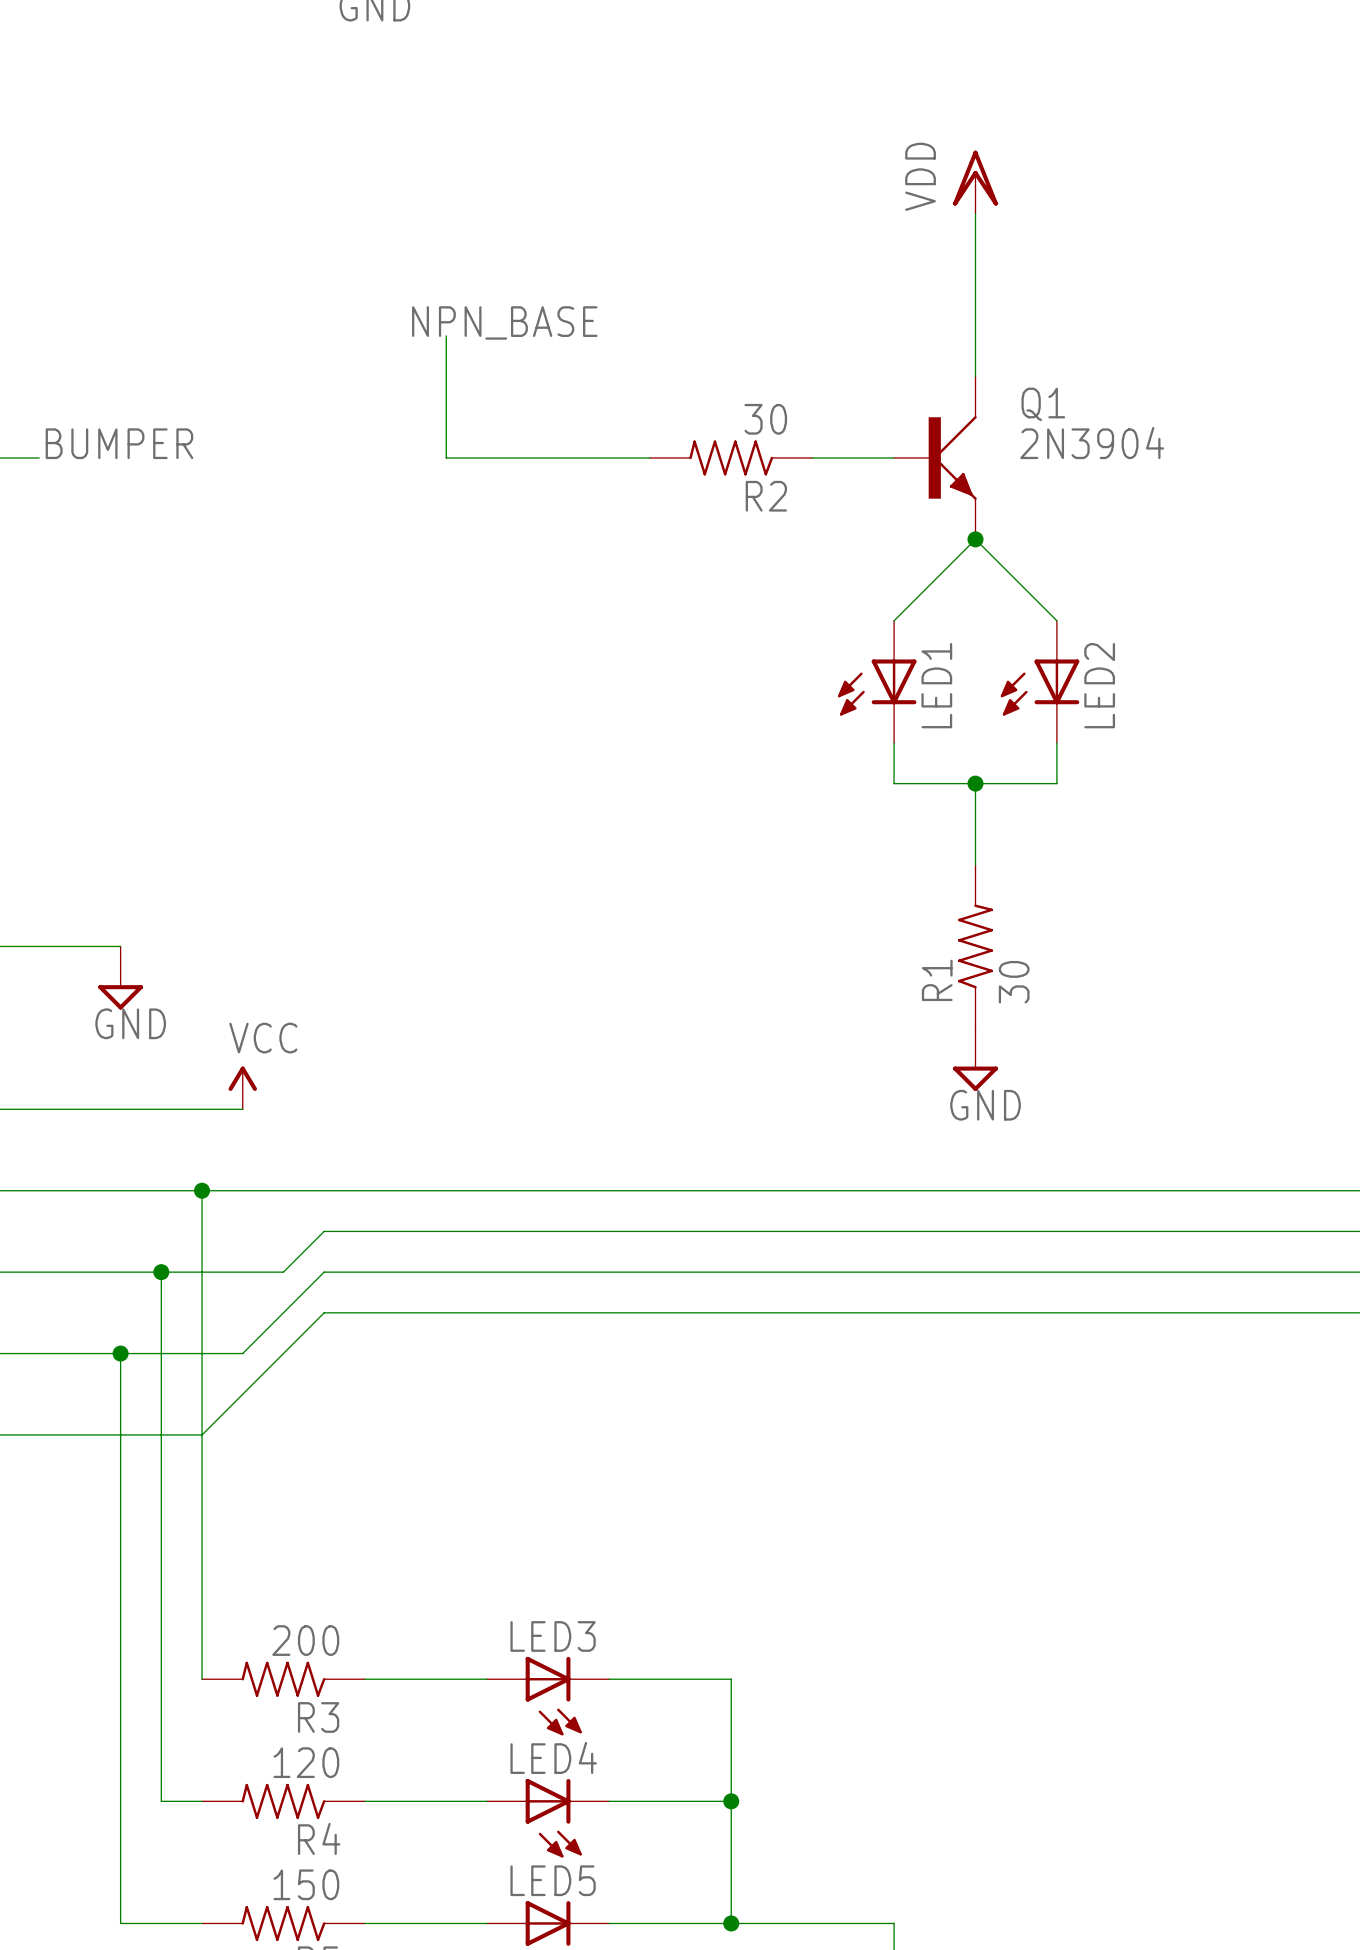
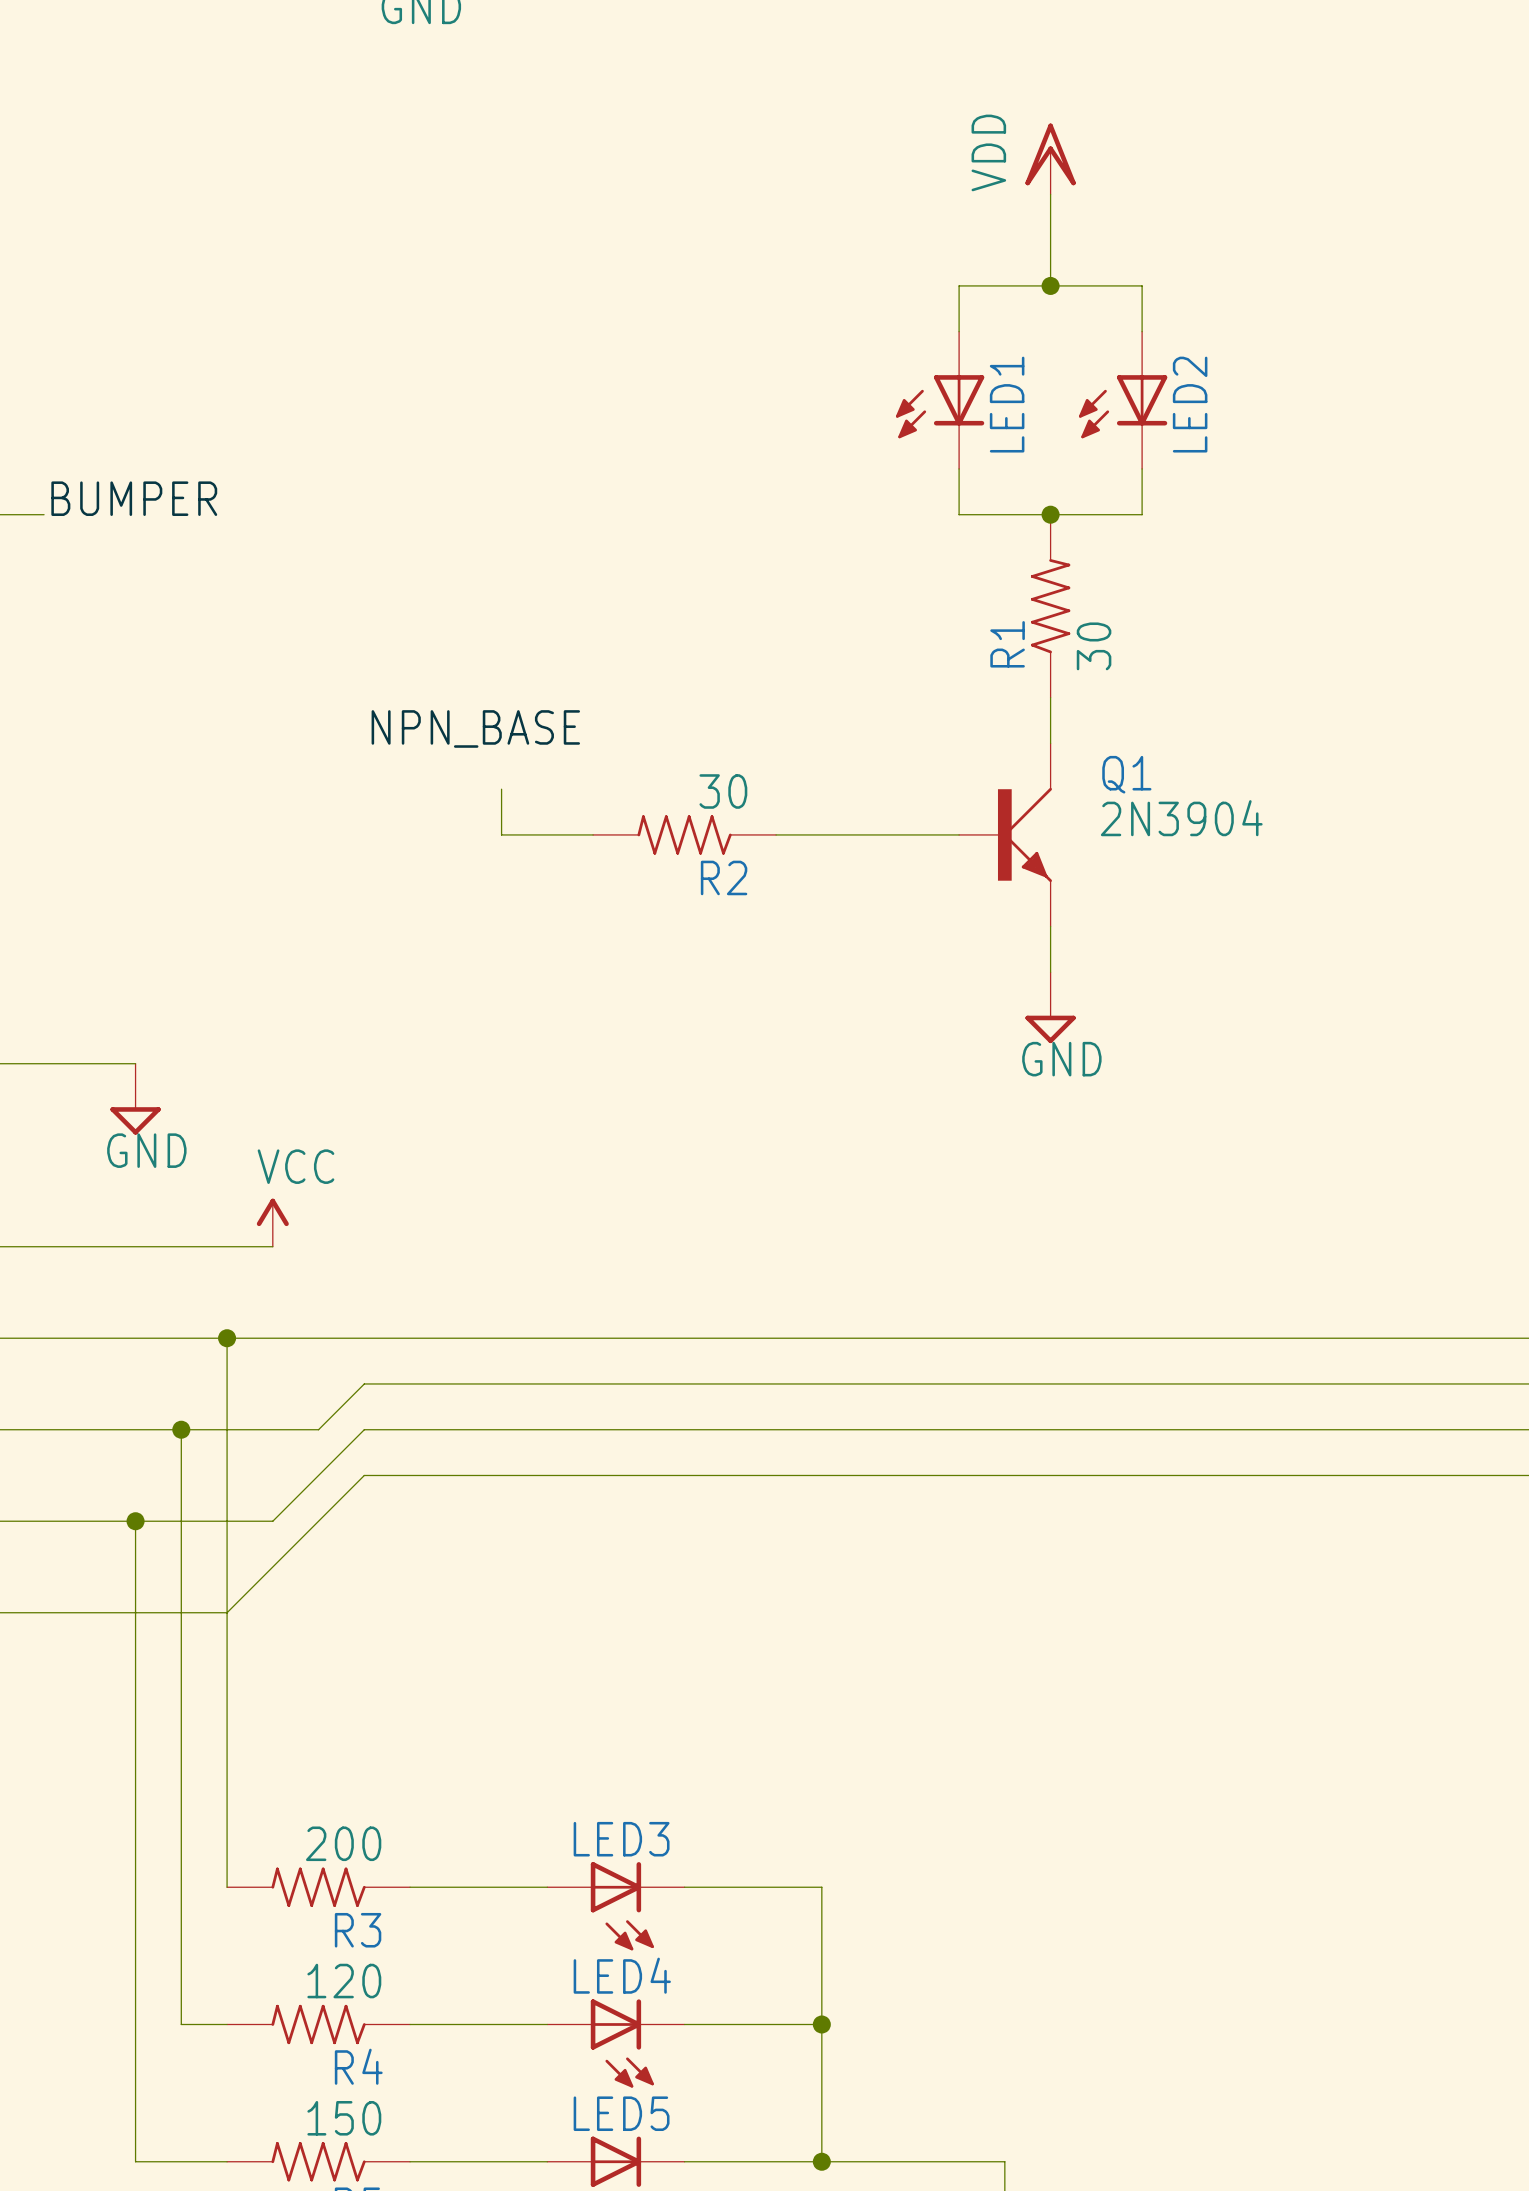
wire: none -> (1050, 194) (1050, 285)
power symbol position: VDD (975, 182) -> VDD (1050, 158)
wire: (975, 213) (975, 376) -> none
junction: none -> (1050, 285)
wire: none -> (959, 331) (959, 285) (1142, 285) (1142, 331)
label position: NPN_BASE (504, 322) -> NPN_BASE (475, 728)
wire: (446, 335) (446, 457) (649, 457) -> none
wire: none -> (1142, 468) (1142, 514) (1004, 514)
R2 position: (731, 457) -> (684, 834)
wire: (812, 457) (853, 457) -> (959, 468) (959, 514)
Q1 position: (935, 457) -> (1005, 834)
junction position: (975, 539) -> (1050, 514)
wire: (894, 620) (975, 539) (1056, 620) -> none
wire: none -> (1050, 697) (1050, 743)
LED1 position: (877, 681) -> (940, 400)
LED2 position: (1040, 681) -> (1123, 400)
wire: none -> (501, 789) (501, 834) (593, 834)
wire: none -> (776, 834) (959, 834)
wire: (894, 742) (894, 783) (1056, 783) (1056, 742) -> none
wire: (975, 783) (975, 865) -> none
junction: (975, 783) -> none
wire: none -> (1050, 926) (1050, 972)
R1 position: (975, 946) -> (1050, 606)
power symbol position: GND (975, 1059) -> GND (1050, 1007)

